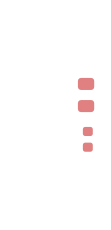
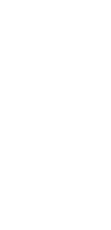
part: (86, 95) -> none
part: (87, 139) -> none

